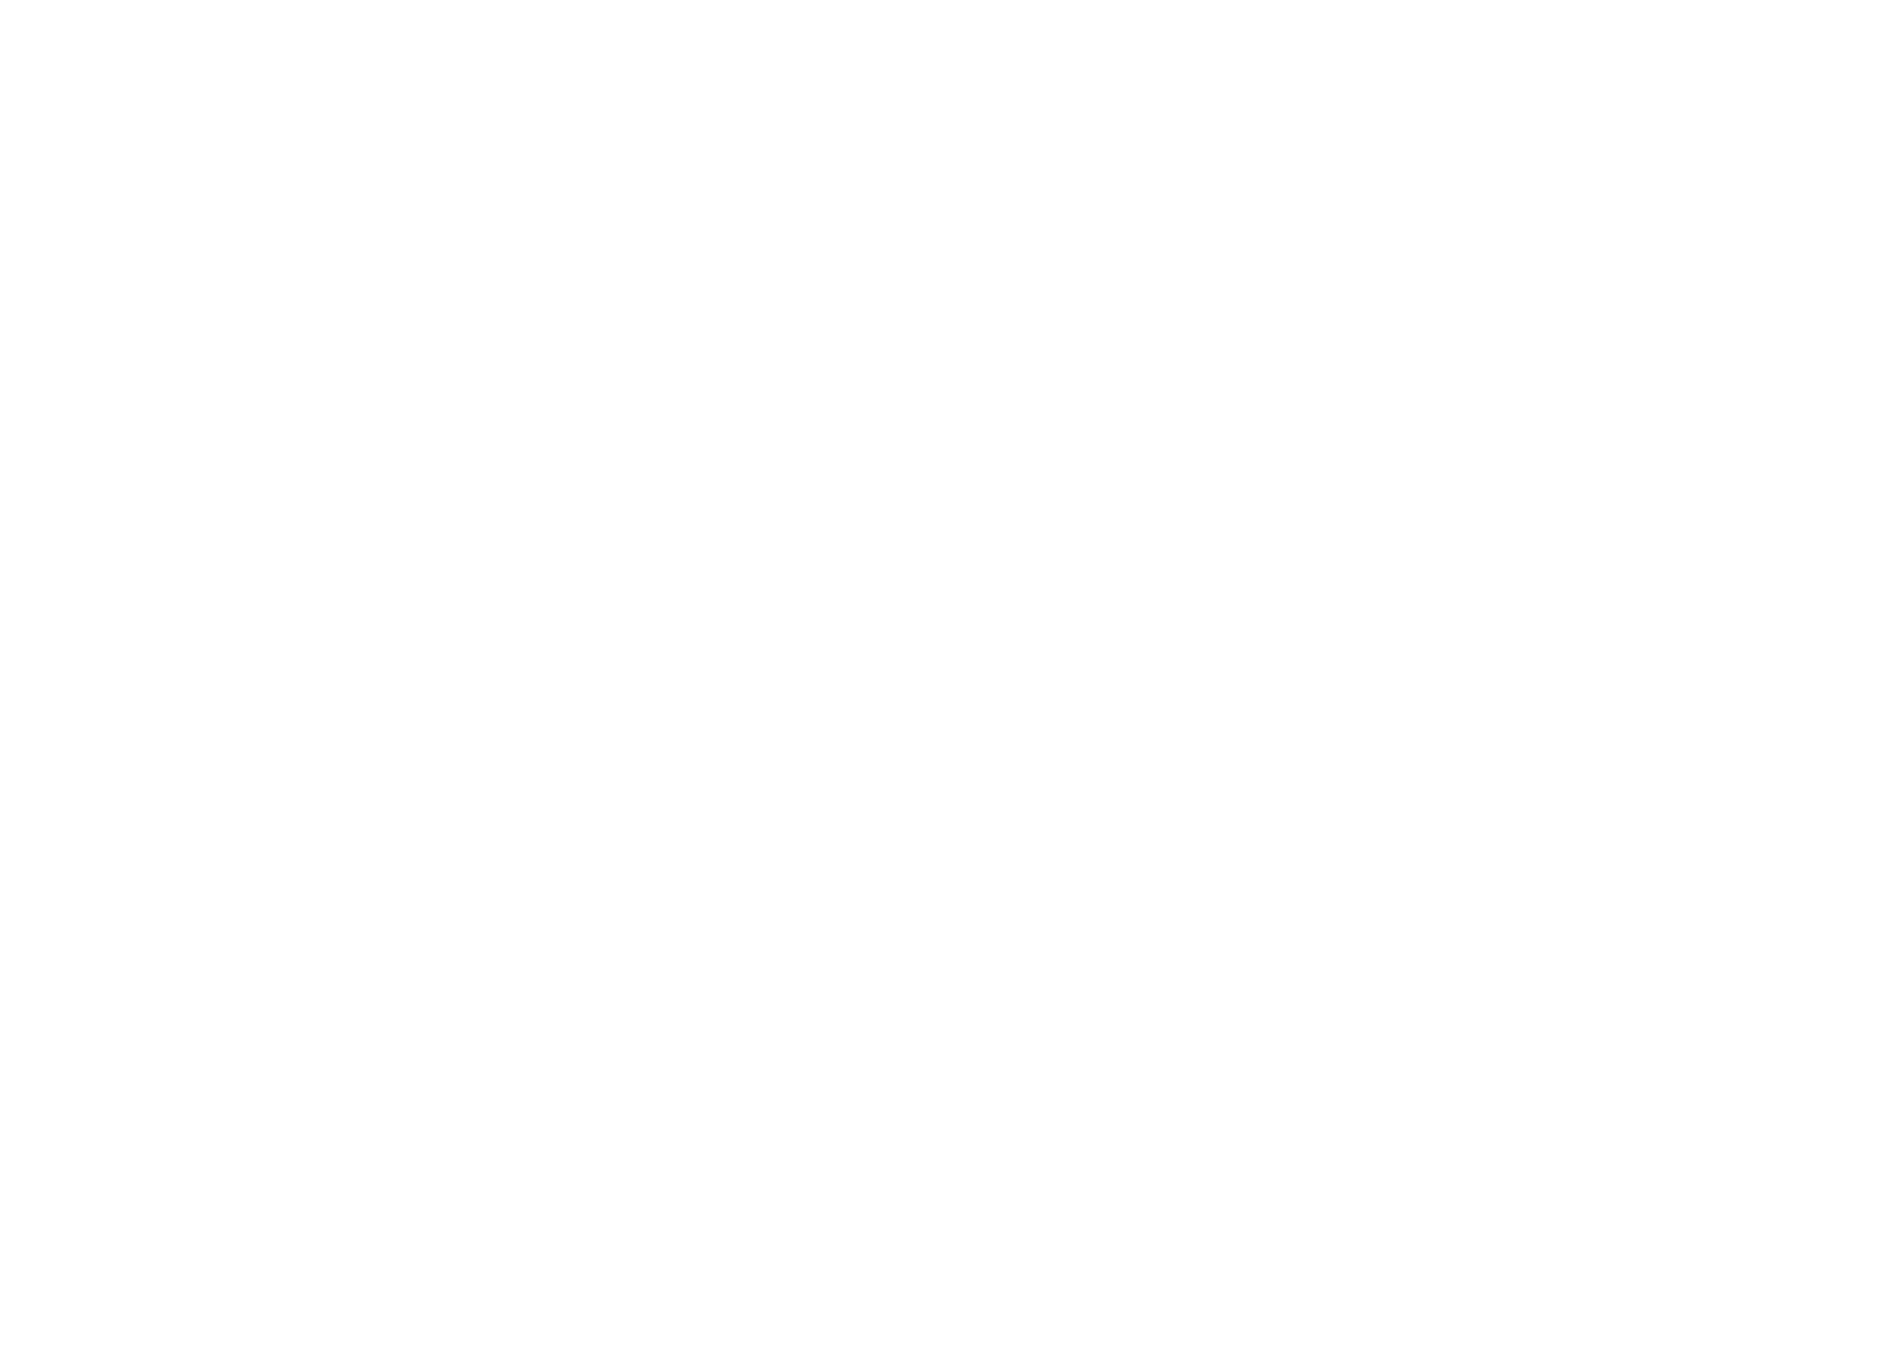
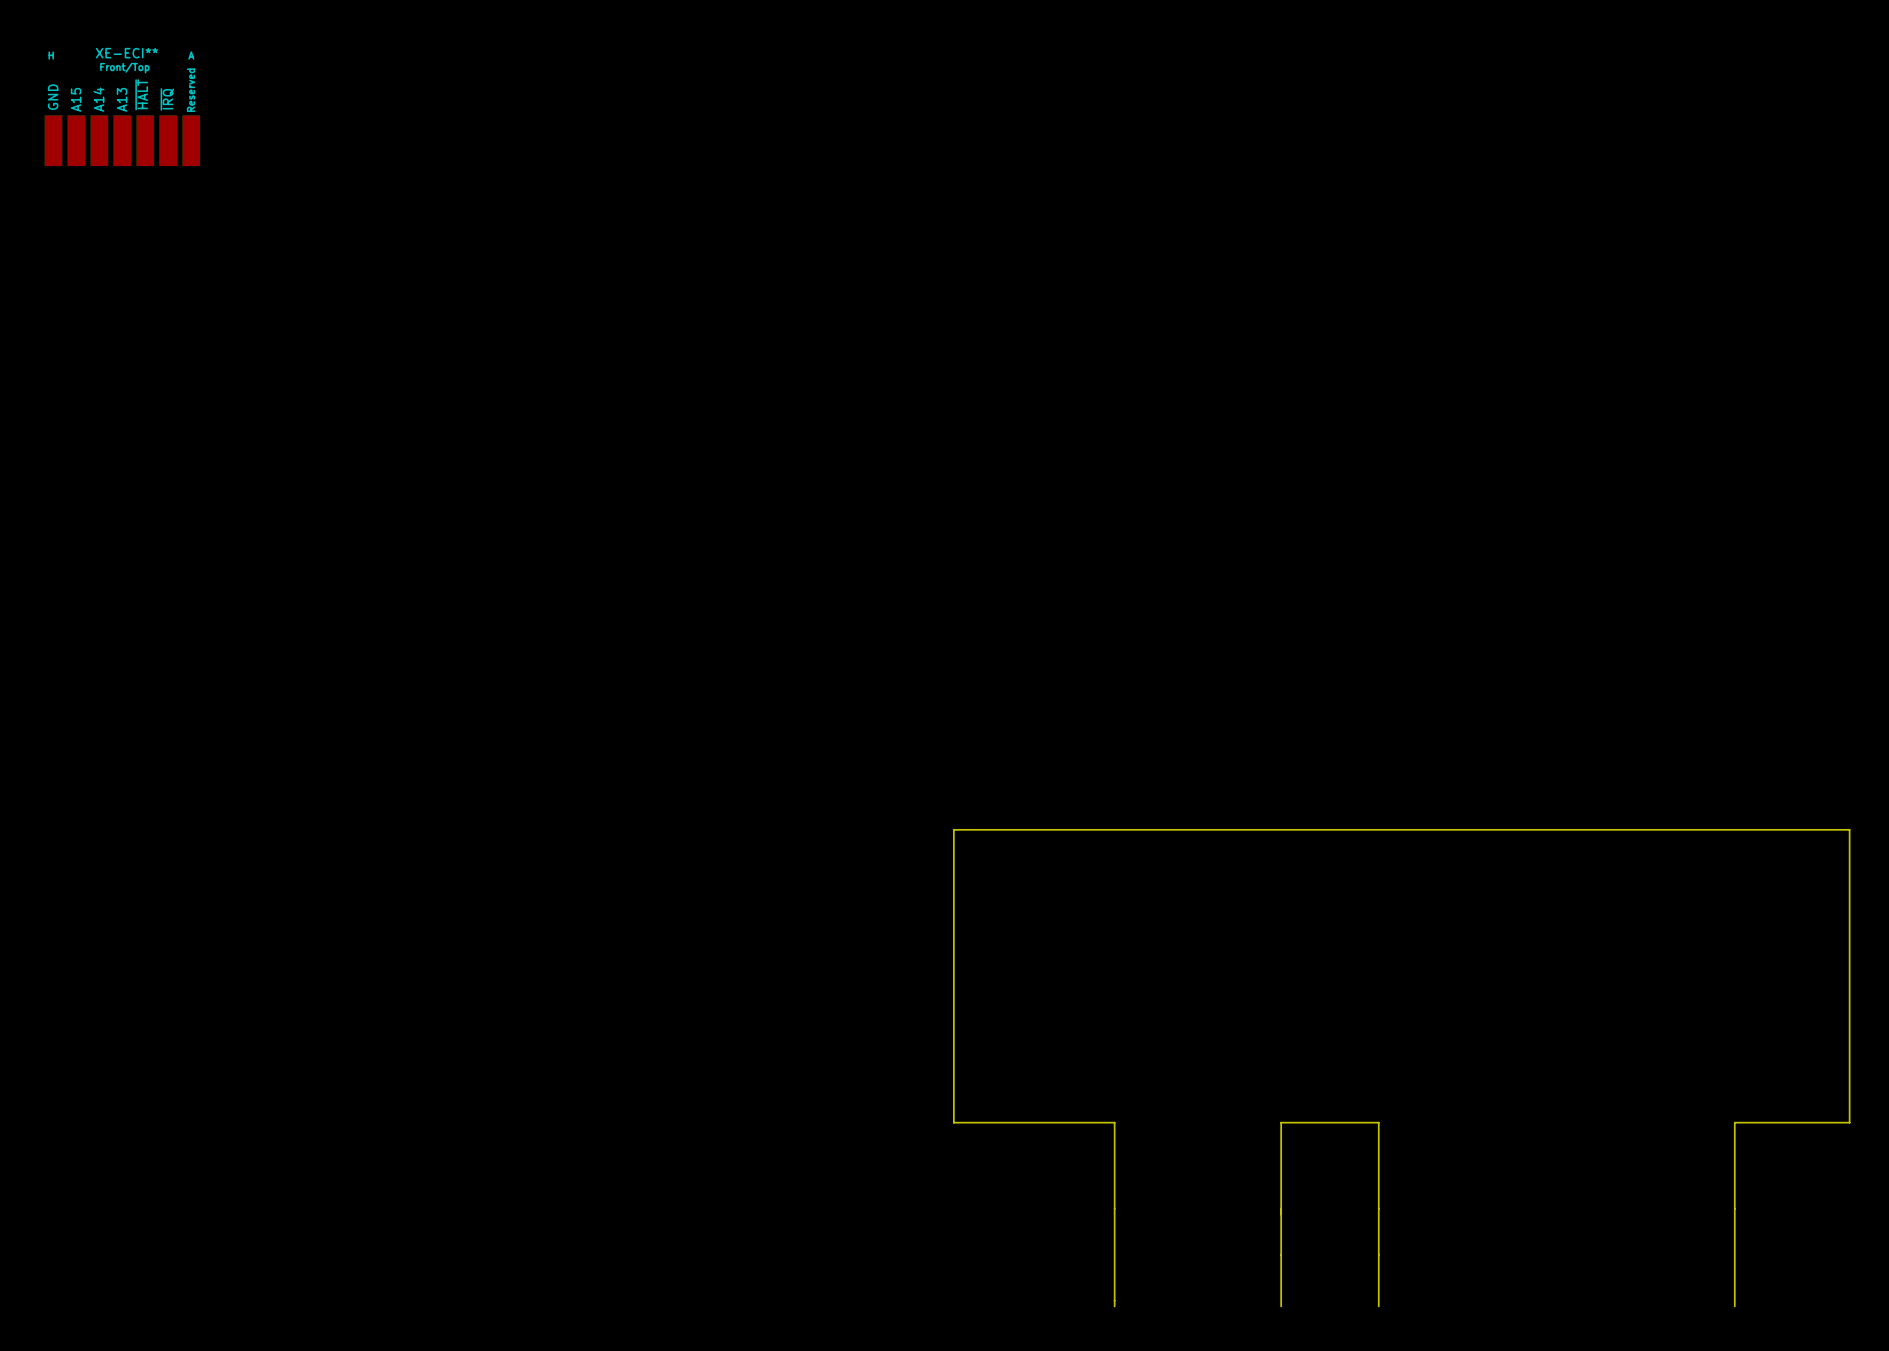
XE-ECI**: none -> (122, 140)
board edge: none -> (1114, 1306) (1114, 1122) (953, 1122) (953, 829) (1849, 829) (1849, 1122) (1734, 1122) (1734, 1306)
board edge: none -> (1281, 1306) (1281, 1122) (1378, 1122) (1378, 1306)

